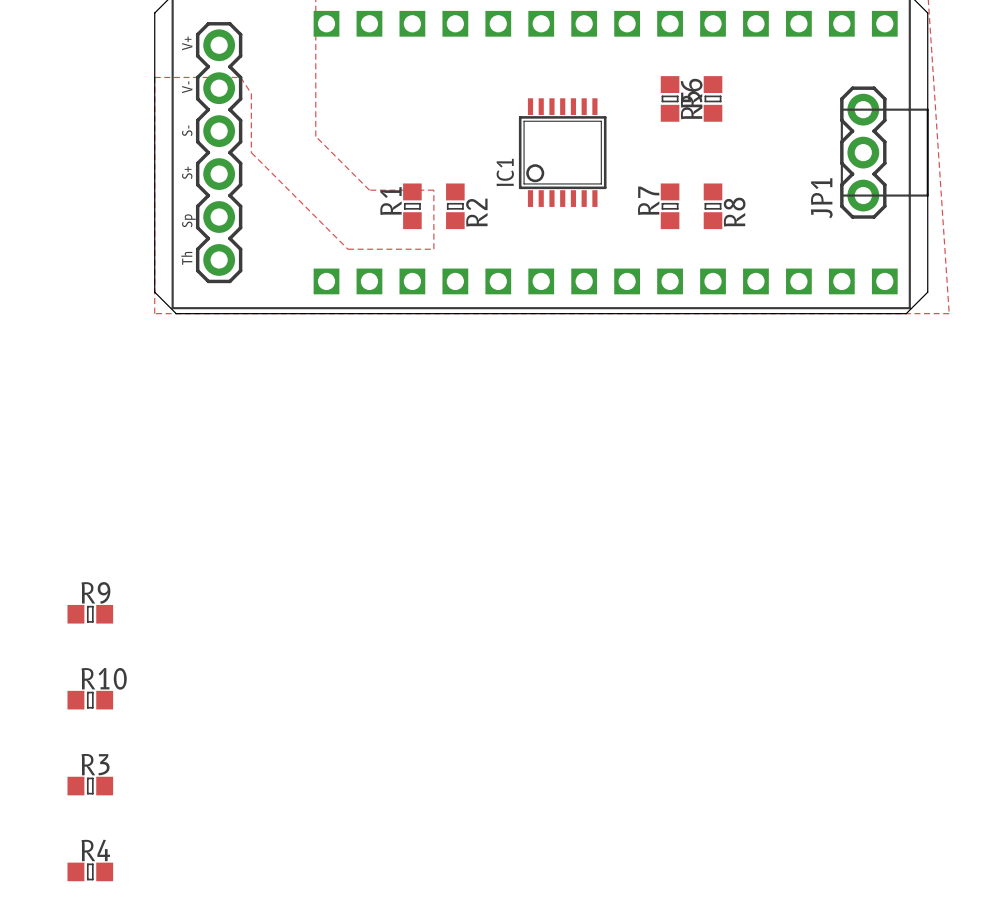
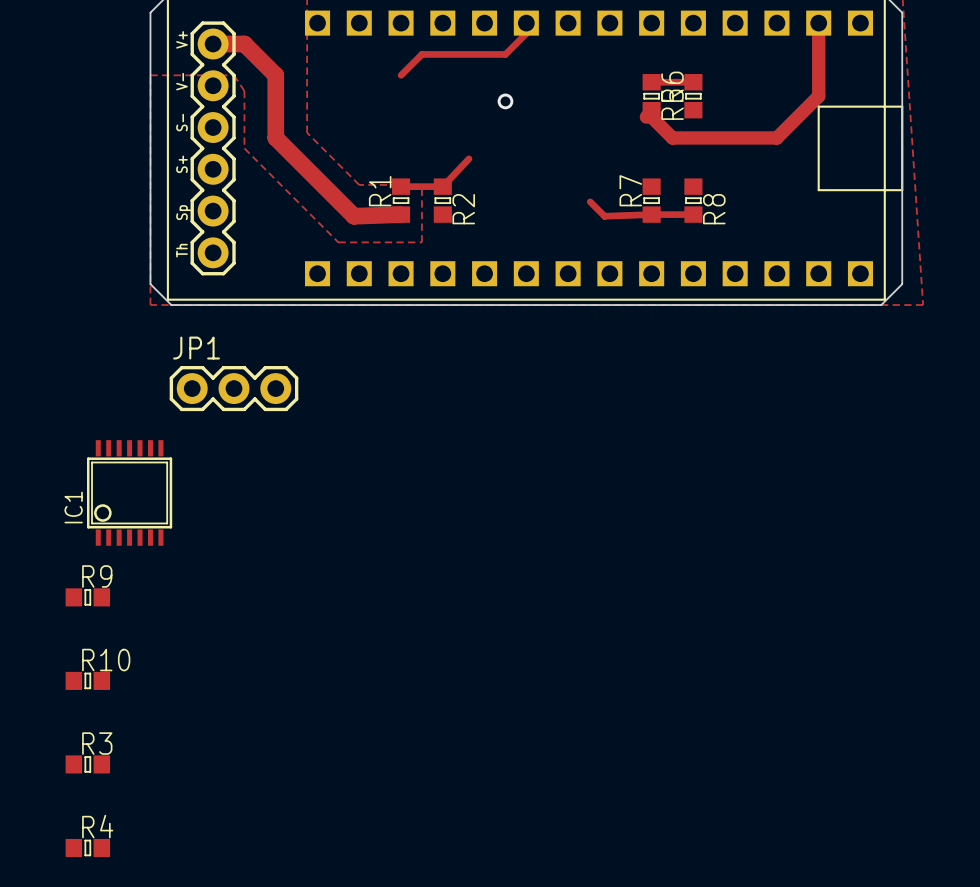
track: none -> (526, 23) (526, 33) (505, 54) (421, 54) (401, 75)
track: none -> (818, 23) (818, 96) (776, 137) (672, 137) (651, 117) (651, 110) (646, 117)
track: none -> (213, 44) (244, 44) (275, 75) (275, 137) (354, 216) (401, 214)
track: none -> (651, 82) (693, 82)
via: none -> (505, 101)
IC1 position: (562, 152) -> (129, 492)
JP1 rotation: 0° (863, 152) -> 90° clockwise (234, 388)
JP1 position: (863, 152) -> (234, 388)
track: none -> (468, 158) (442, 186) (401, 186)
track: none -> (590, 201) (604, 216) (693, 214)

